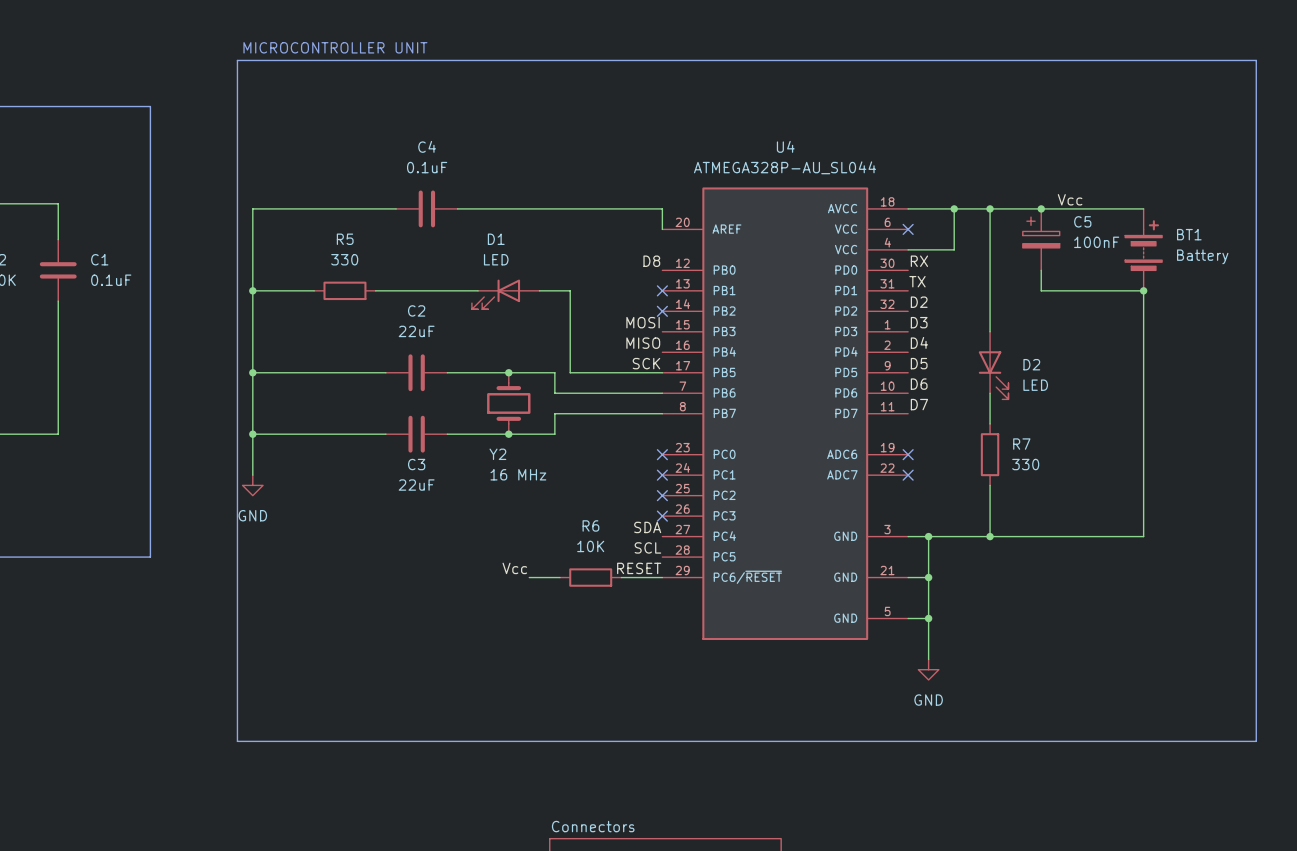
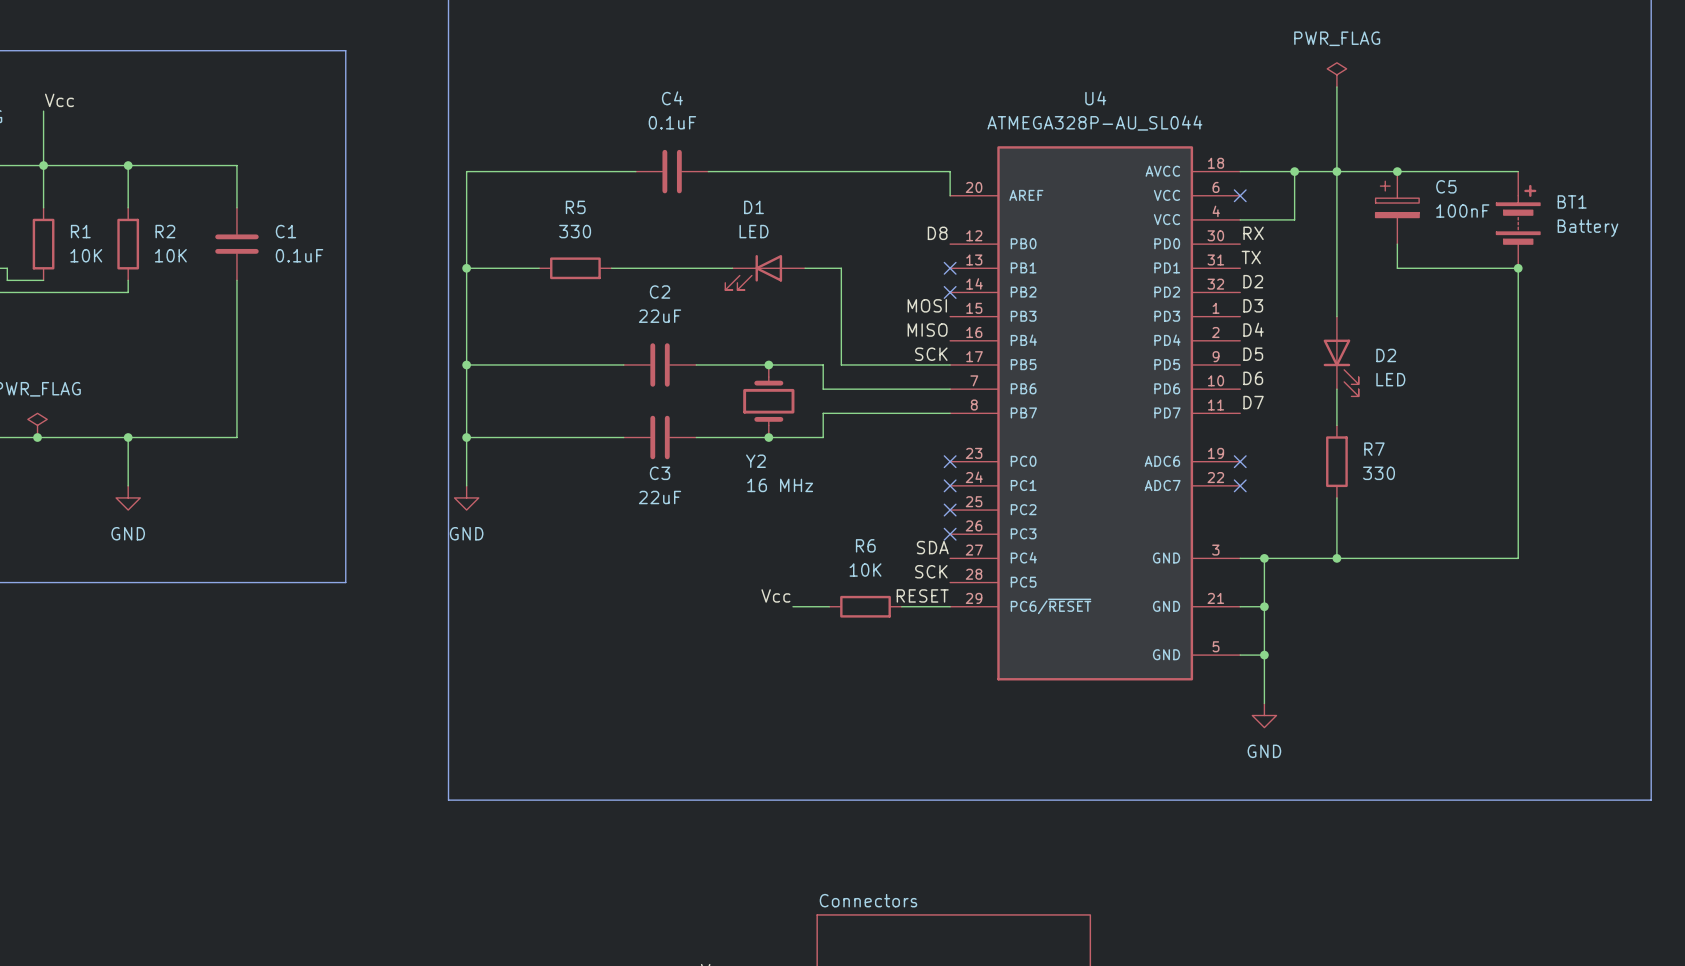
power symbol: none -> PWR_FLAG (1336, 74)
wire: none -> (1336, 86) (1336, 171)
label: Vcc (1070, 199) -> none
label: SCL (647, 547) -> SCK (931, 571)

